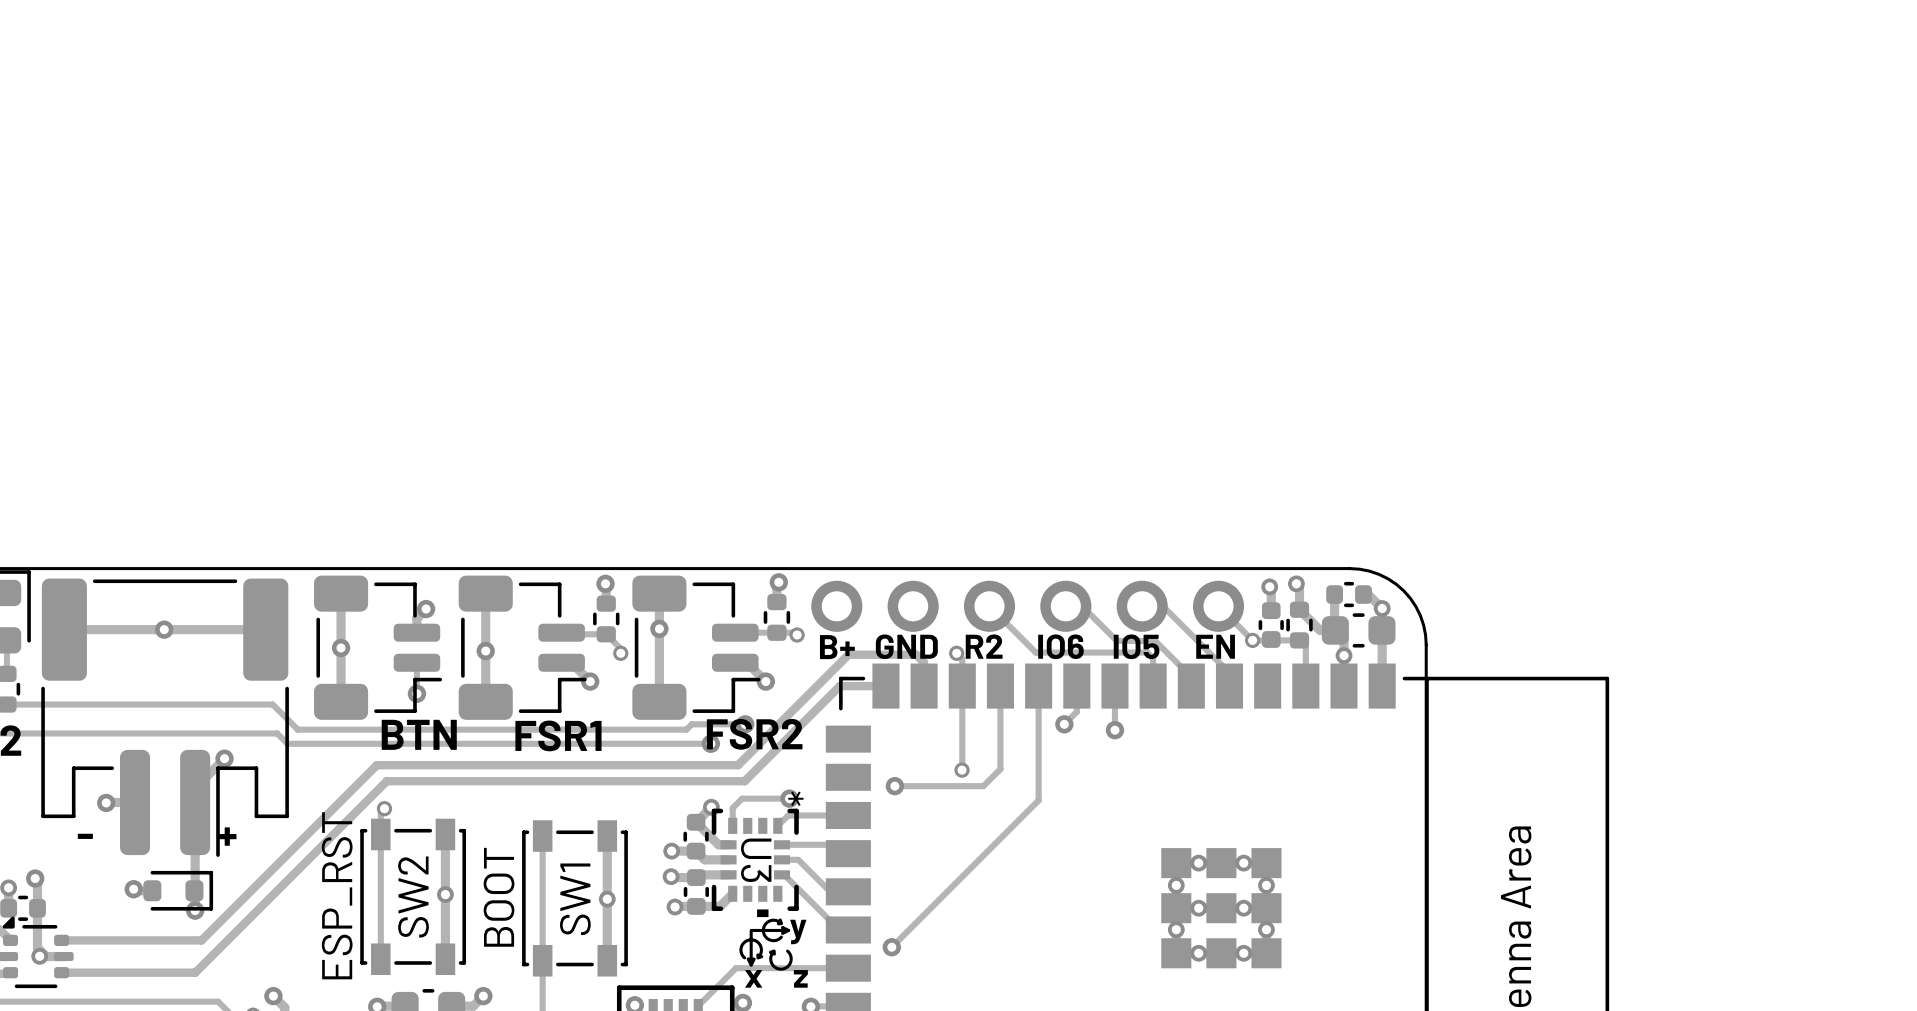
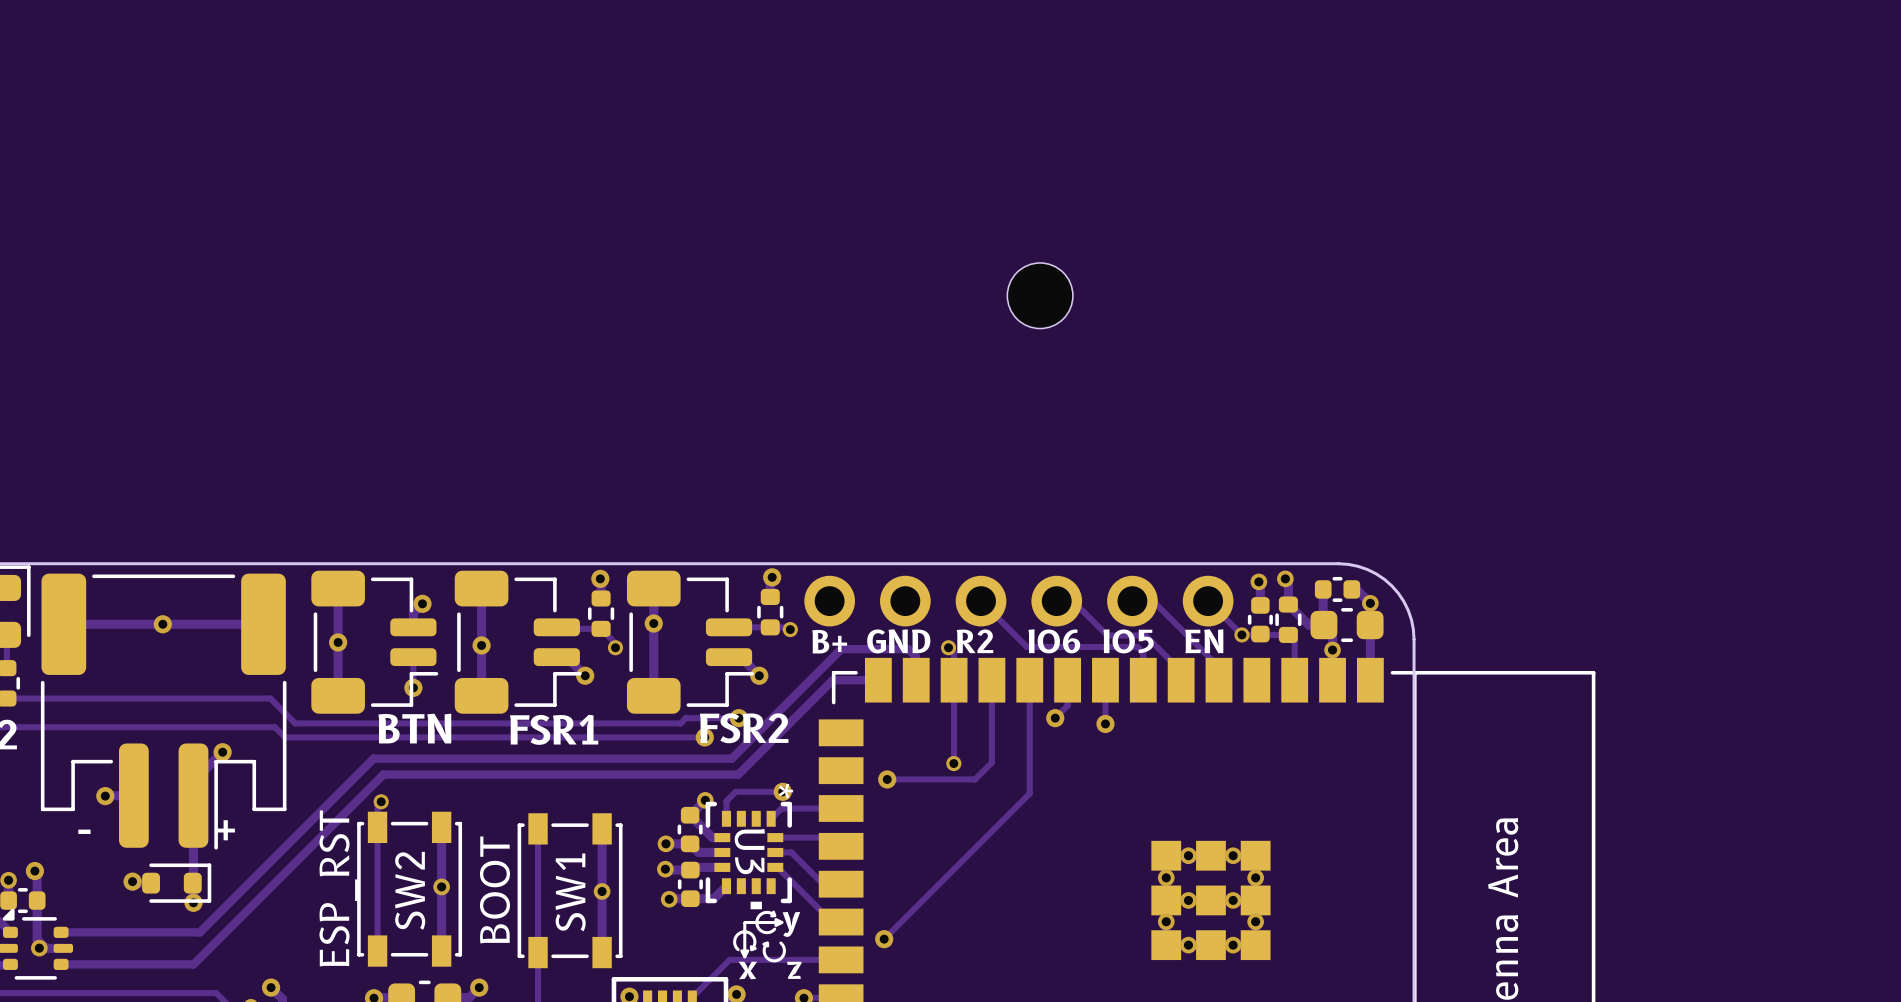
part: none -> (1040, 295)

